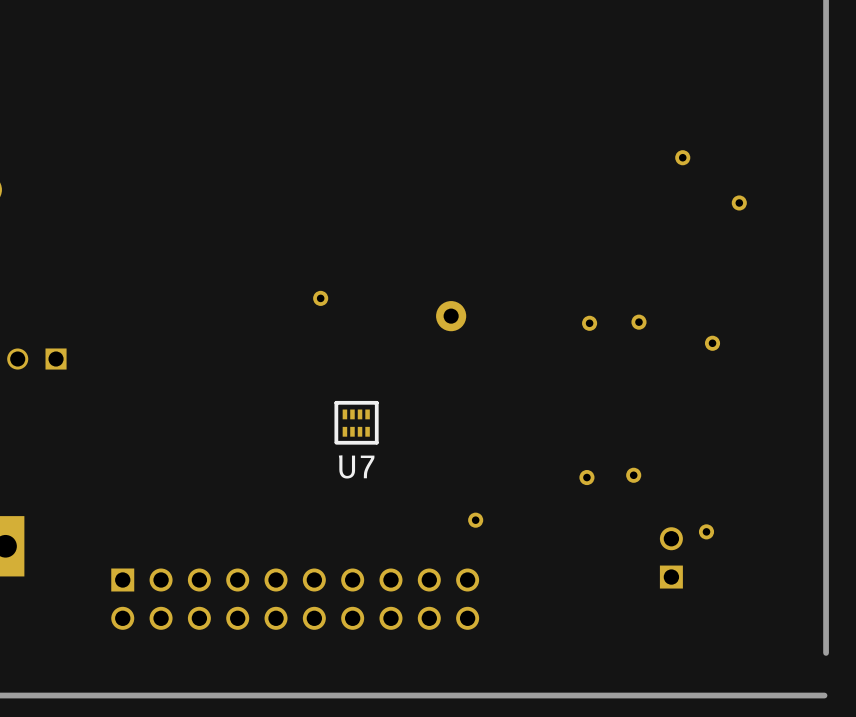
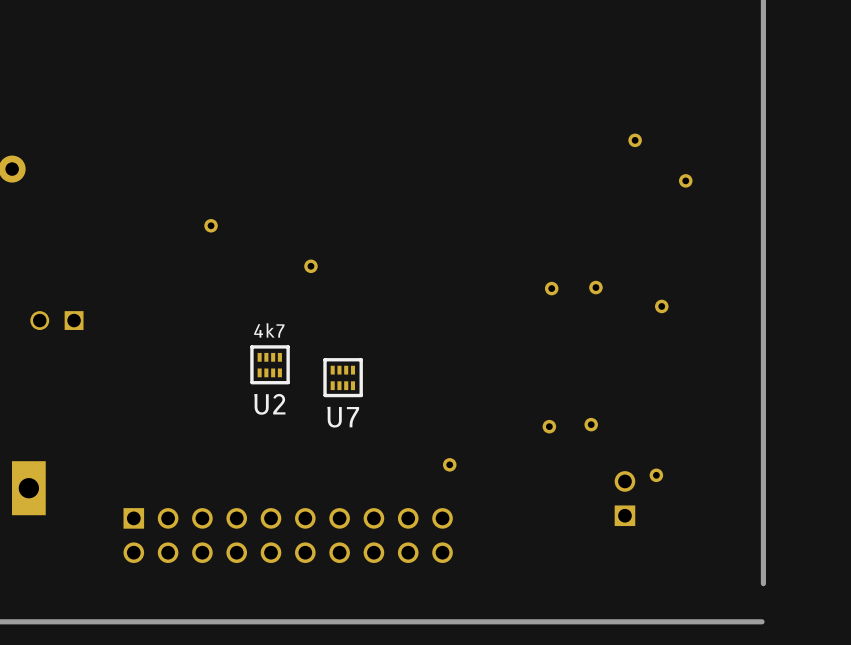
part: none -> (211, 225)
part: (451, 316) -> none
U2: none -> 4k7 (270, 364)

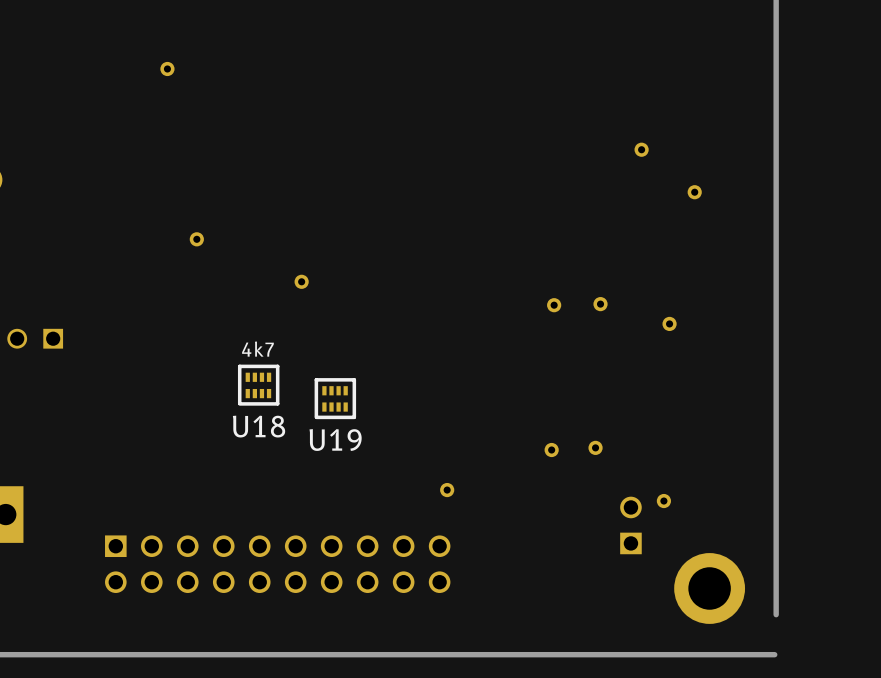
part: none -> (167, 68)
U2 name: U2 (269, 404) -> U18 (259, 426)
U7 name: U7 (343, 417) -> U19 (335, 440)
part: none -> (709, 588)

